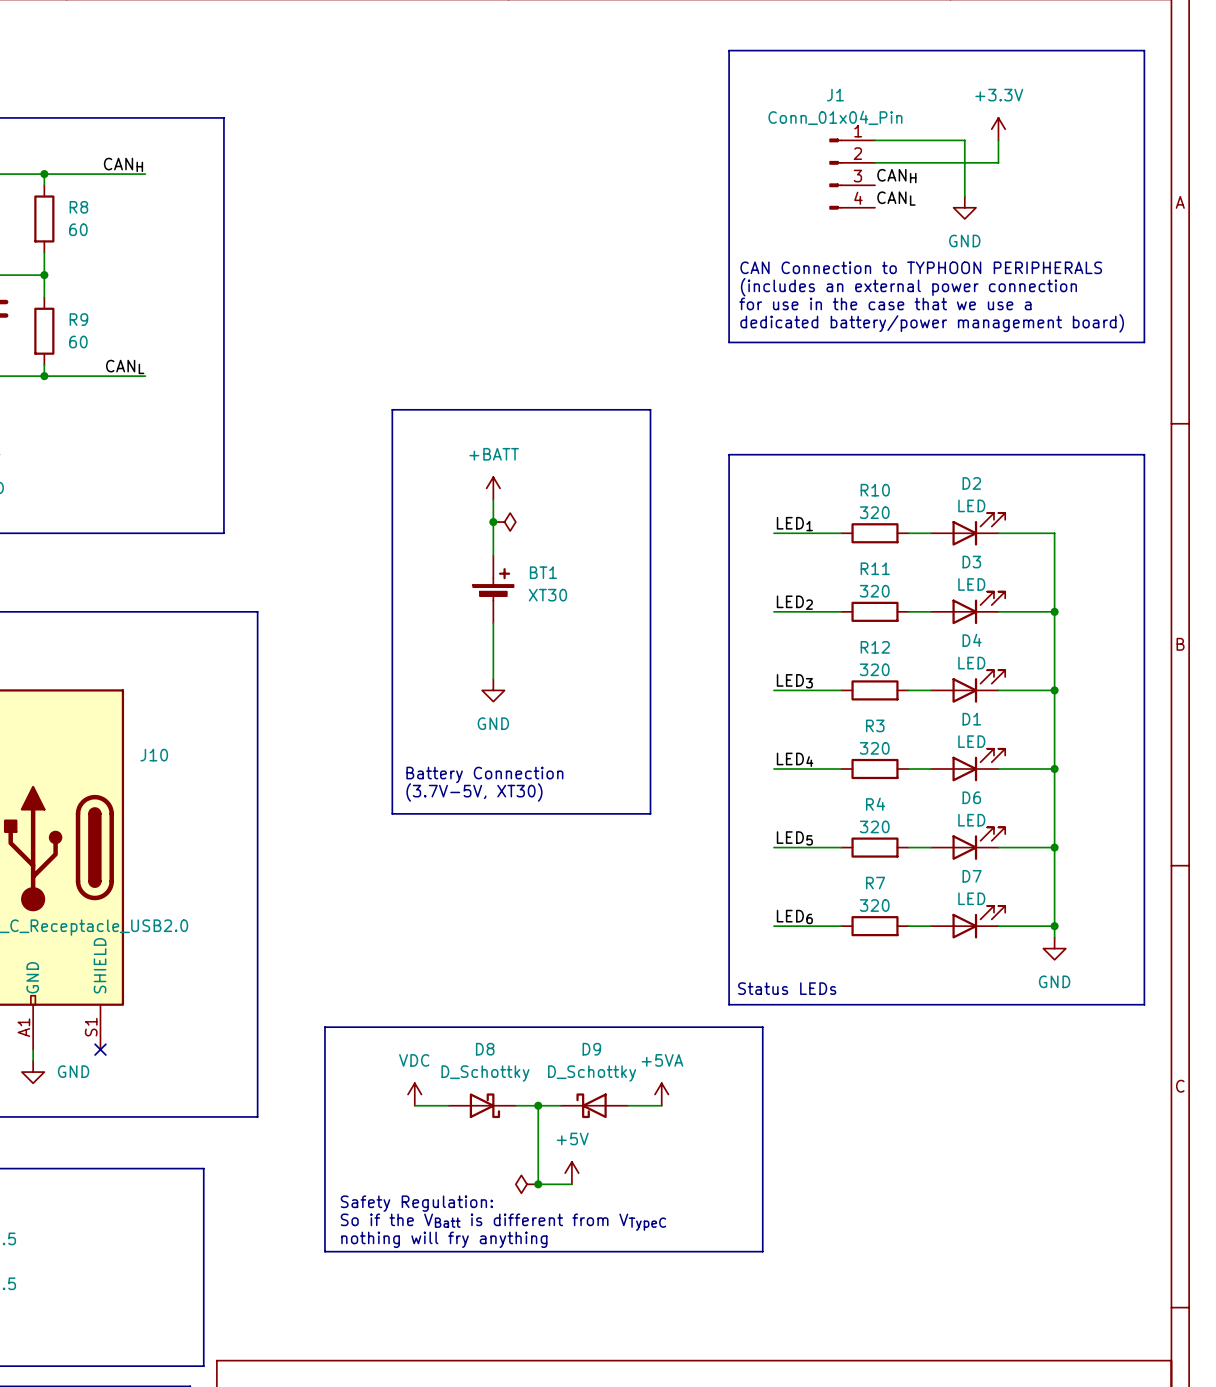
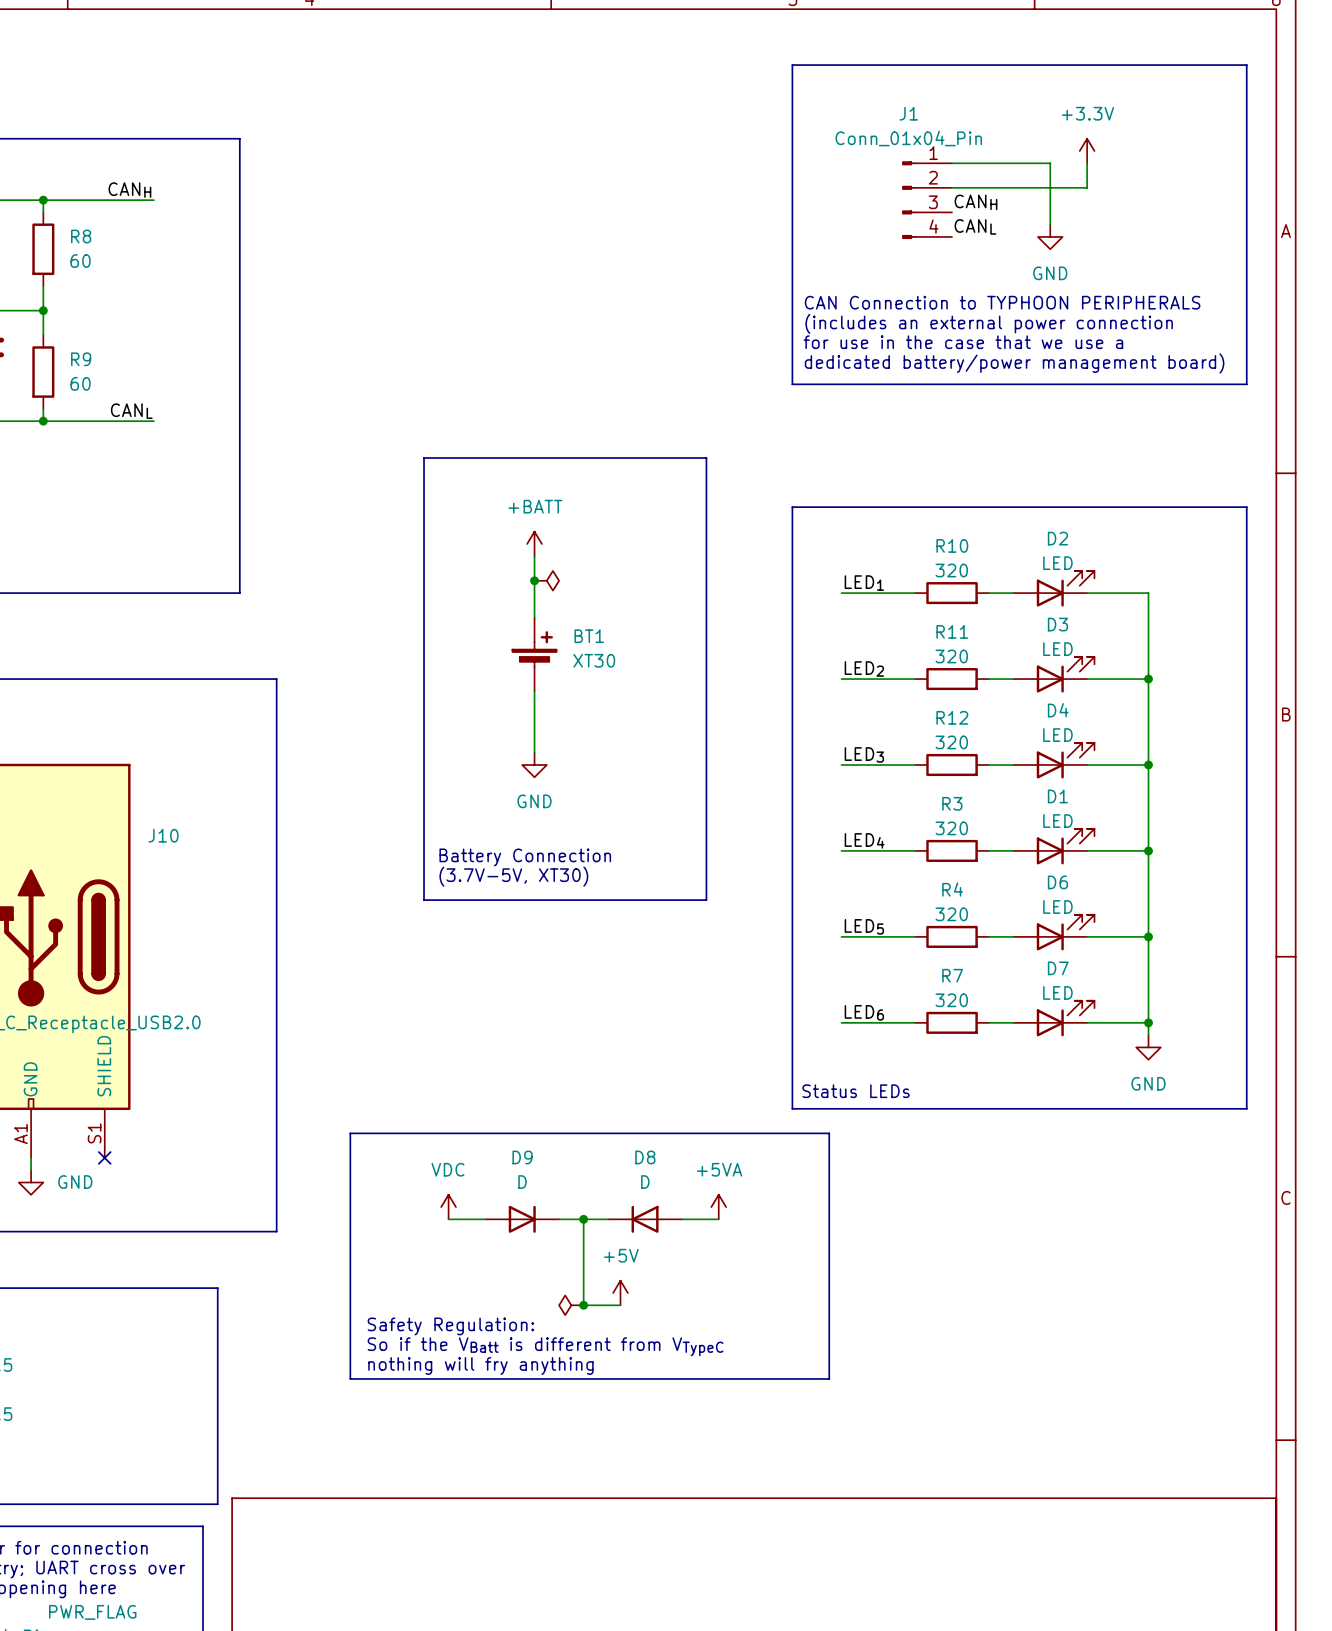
D8 value: D_Schottky (485, 1073) -> D (645, 1182)
D9 value: D_Schottky (592, 1073) -> D (522, 1182)
D8 symbol: [448, 1093, 516, 1119] -> [608, 1205, 682, 1233]
D9 symbol: [560, 1093, 629, 1119] -> [485, 1205, 560, 1233]

